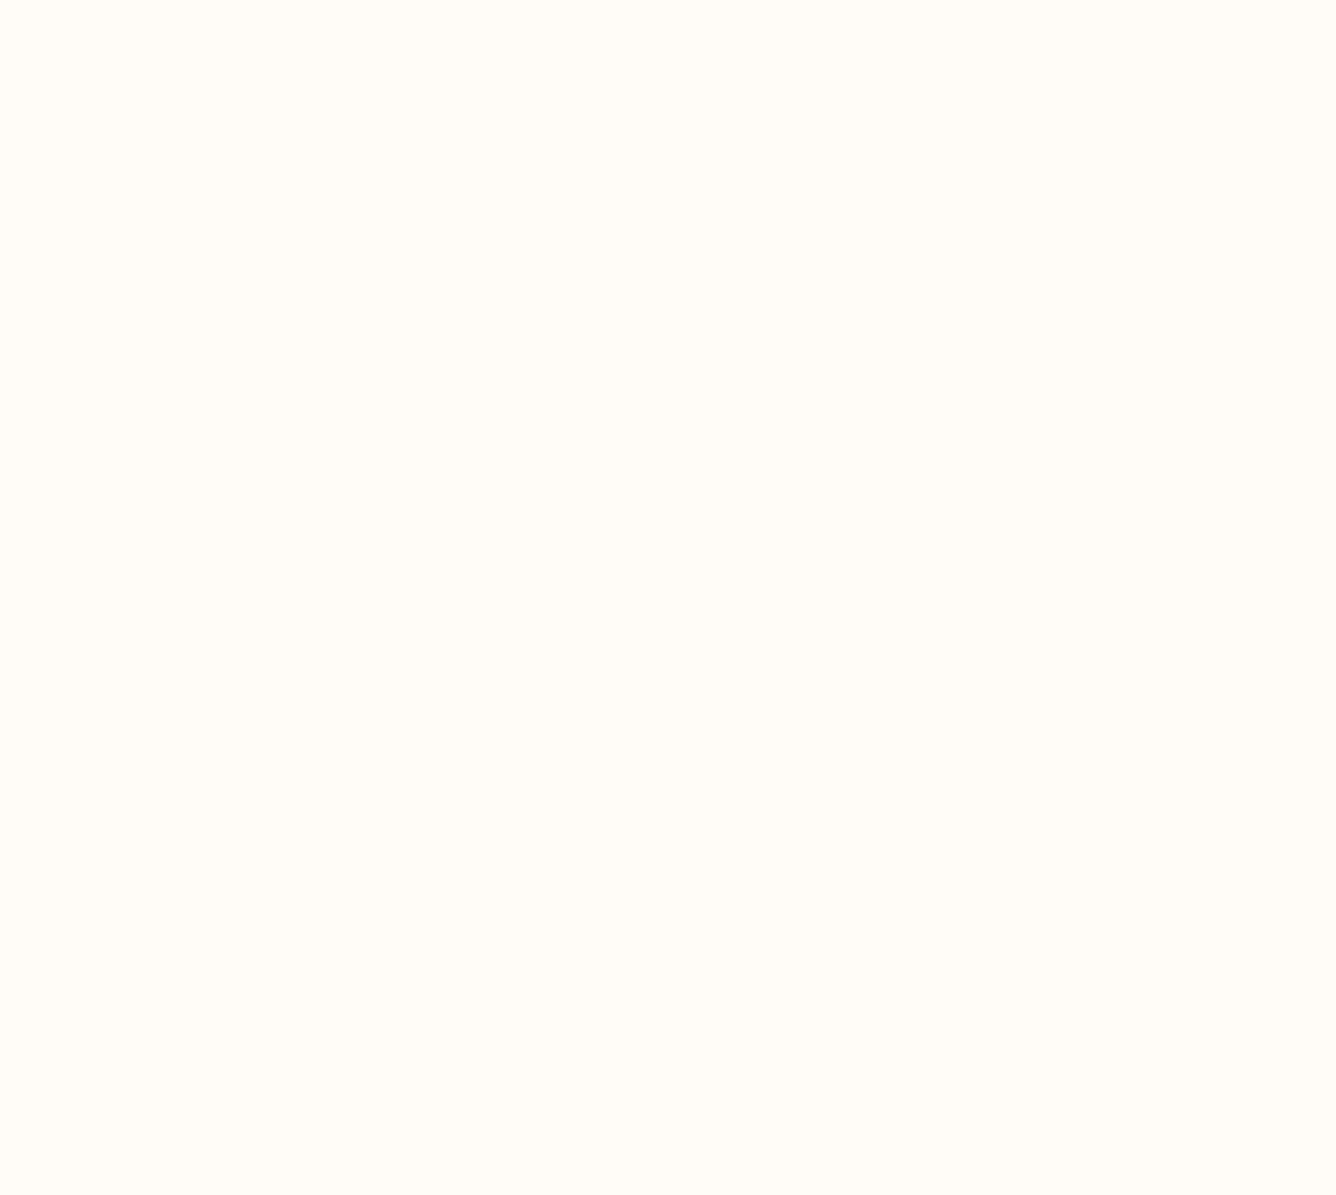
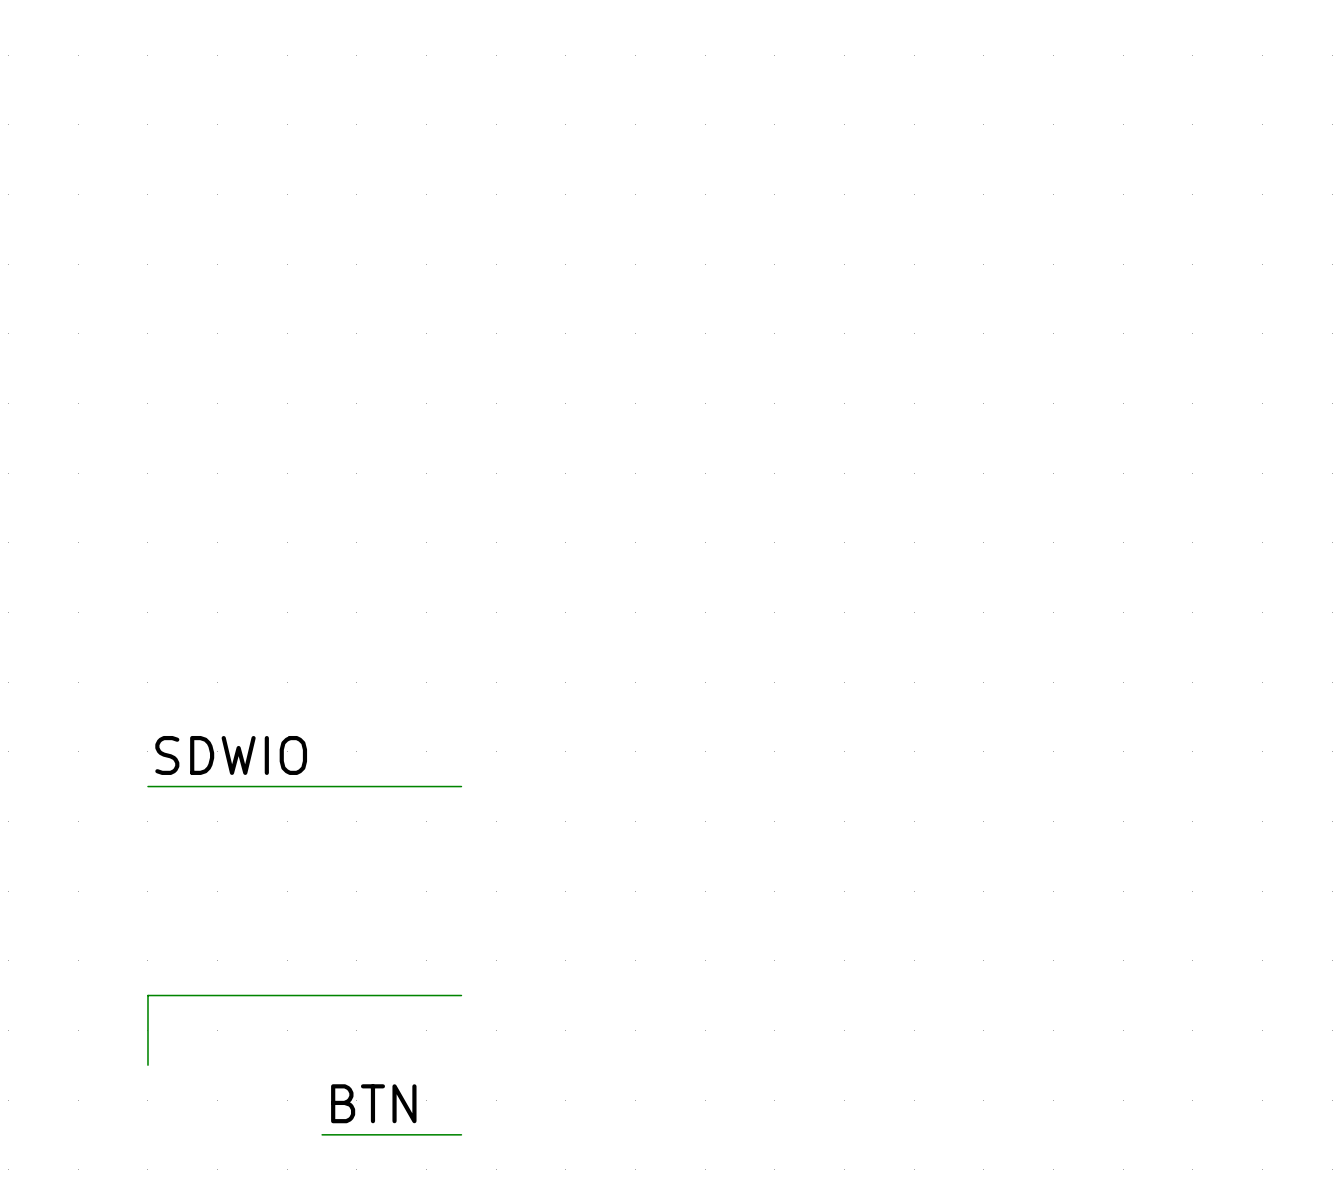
label: none -> SDWIO (231, 755)
wire: none -> (147, 786) (461, 786)
wire: none -> (461, 995) (147, 995) (147, 1065)
label: none -> BTN (373, 1103)
wire: none -> (322, 1134) (461, 1134)

